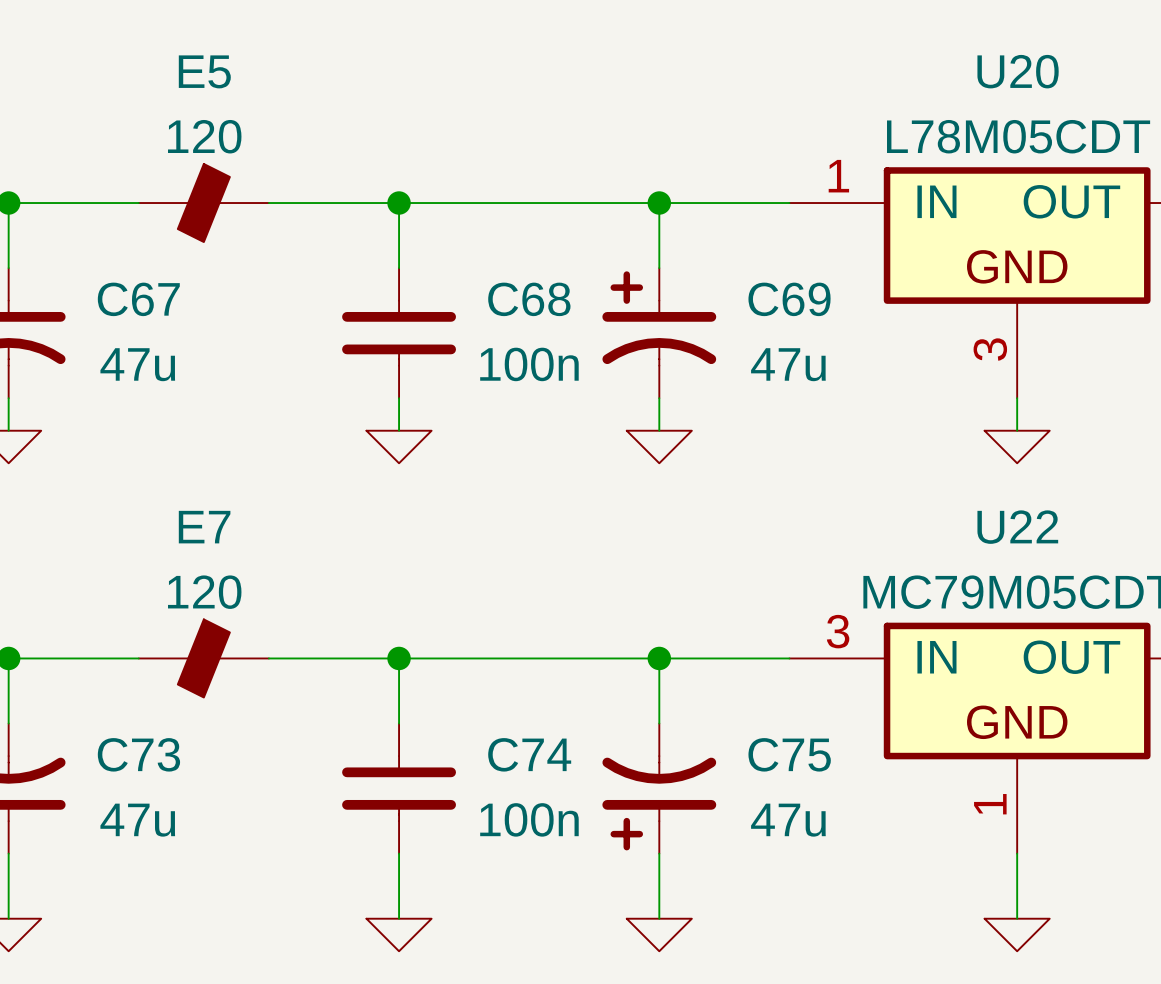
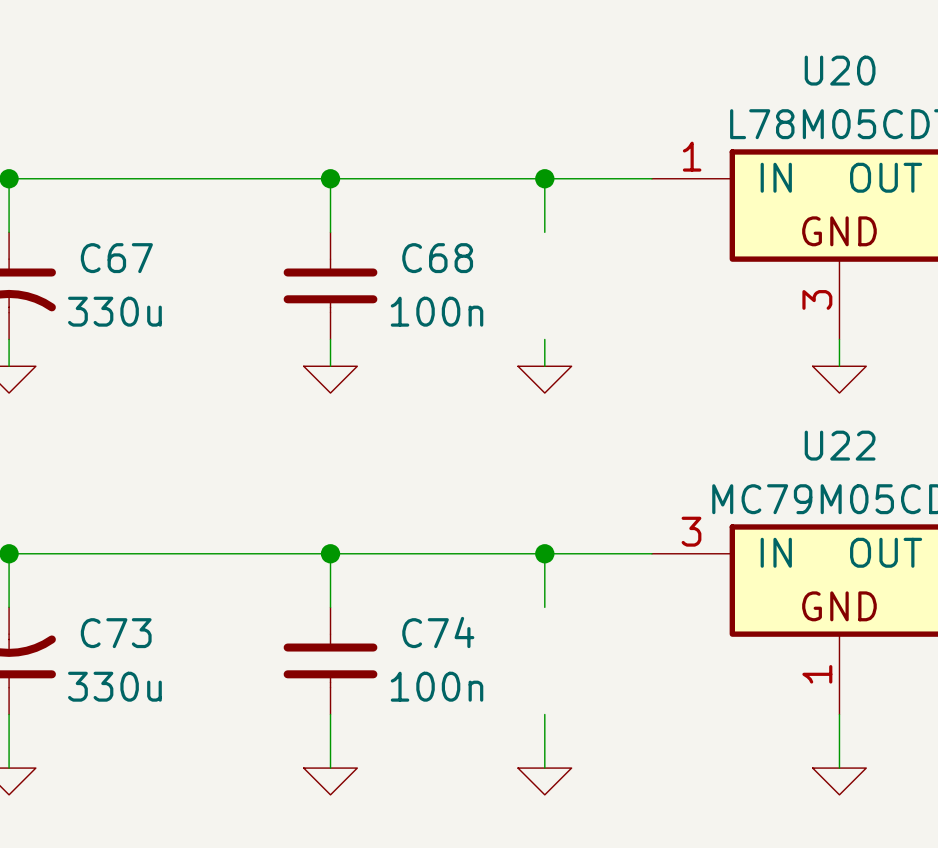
E5: 120 (203, 203) -> none
C69: 47u (659, 333) -> none
C67 value: 47u (137, 364) -> 330u (114, 311)
E7: 120 (203, 658) -> none
C75: 47u (659, 788) -> none
C73 value: 47u (137, 820) -> 330u (114, 686)

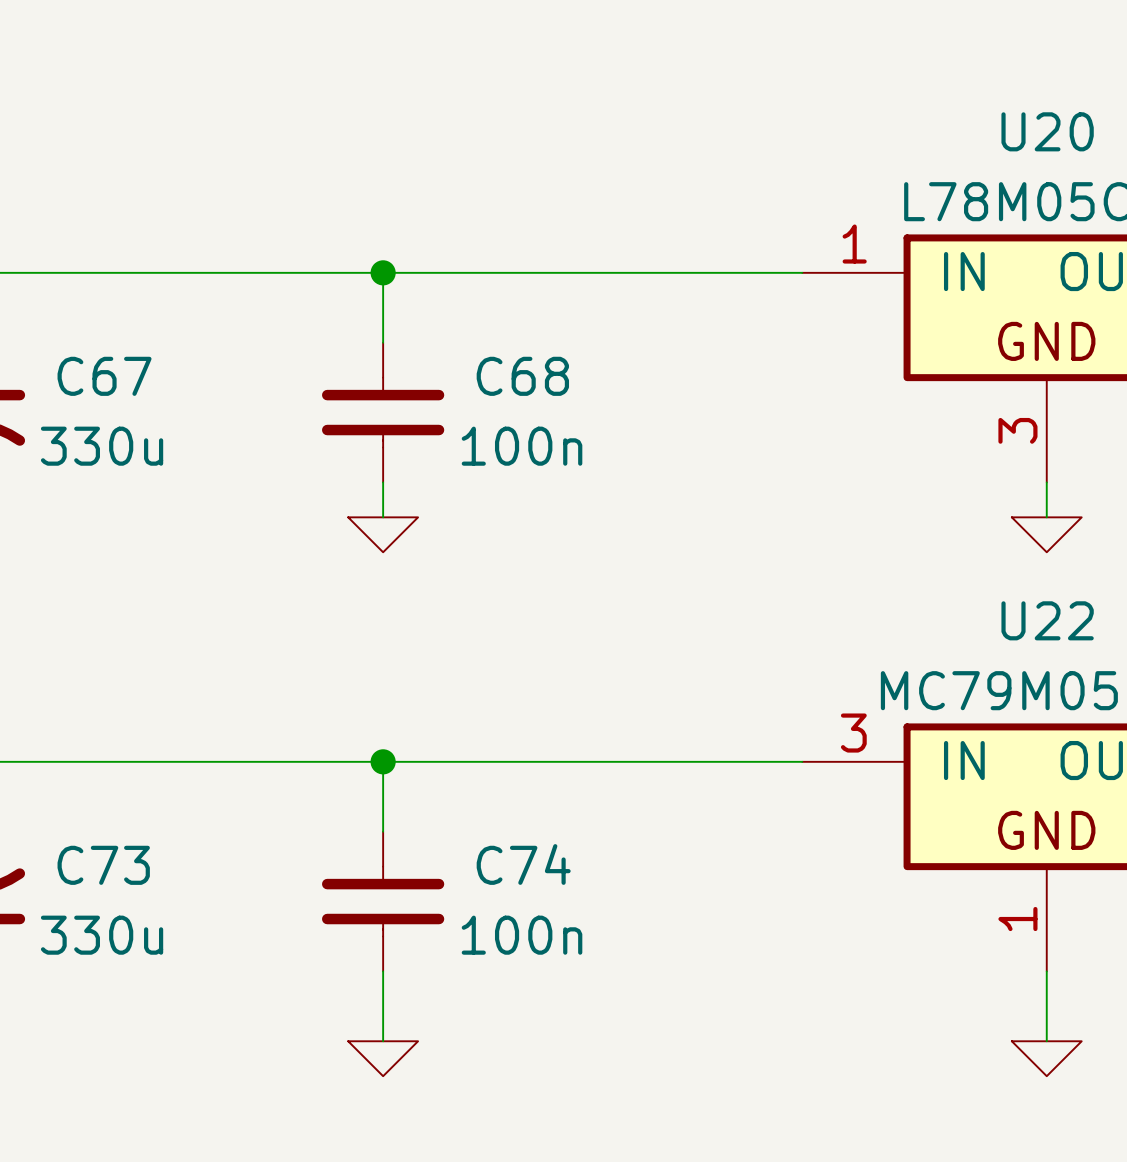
wire: (544, 178) (544, 232) -> none
junction: (544, 178) -> none
wire: (544, 339) (544, 366) -> none
power symbol: (544, 379) -> none
wire: (544, 553) (544, 607) -> none
junction: (544, 553) -> none
wire: (544, 714) (544, 768) -> none
power symbol: (544, 781) -> none

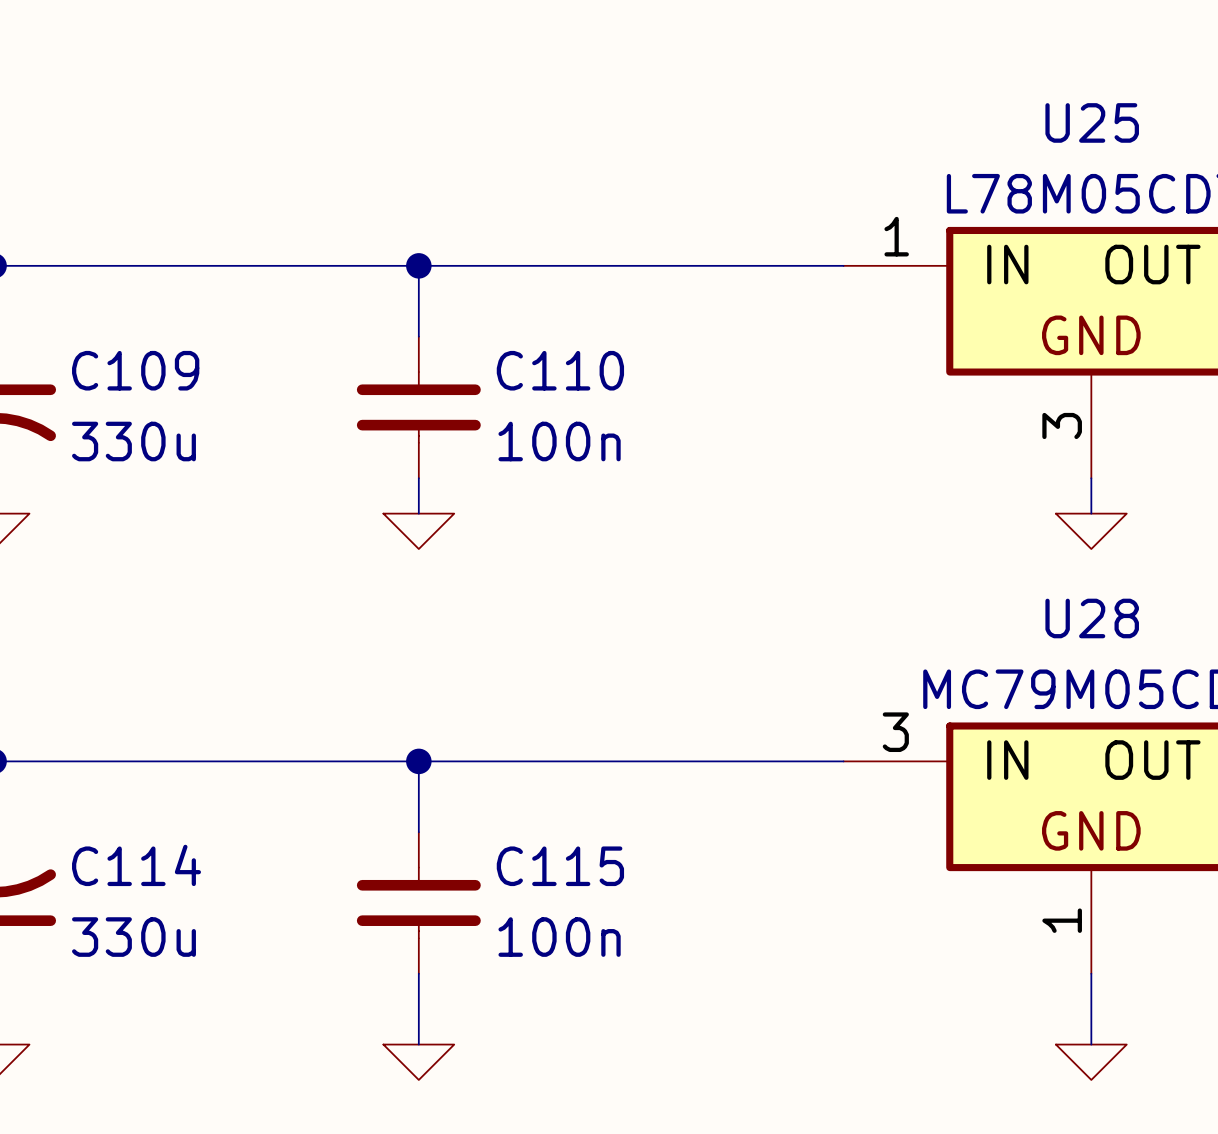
U20 name: U20 (1047, 131) -> U25 (1092, 122)
C67 name: C67 (104, 376) -> C109 (135, 370)
C68 name: C68 (522, 376) -> C110 (560, 370)
U22 name: U22 (1047, 620) -> U28 (1092, 618)
C74 name: C74 (523, 864) -> C115 (560, 866)
C73 name: C73 (103, 865) -> C114 (136, 865)

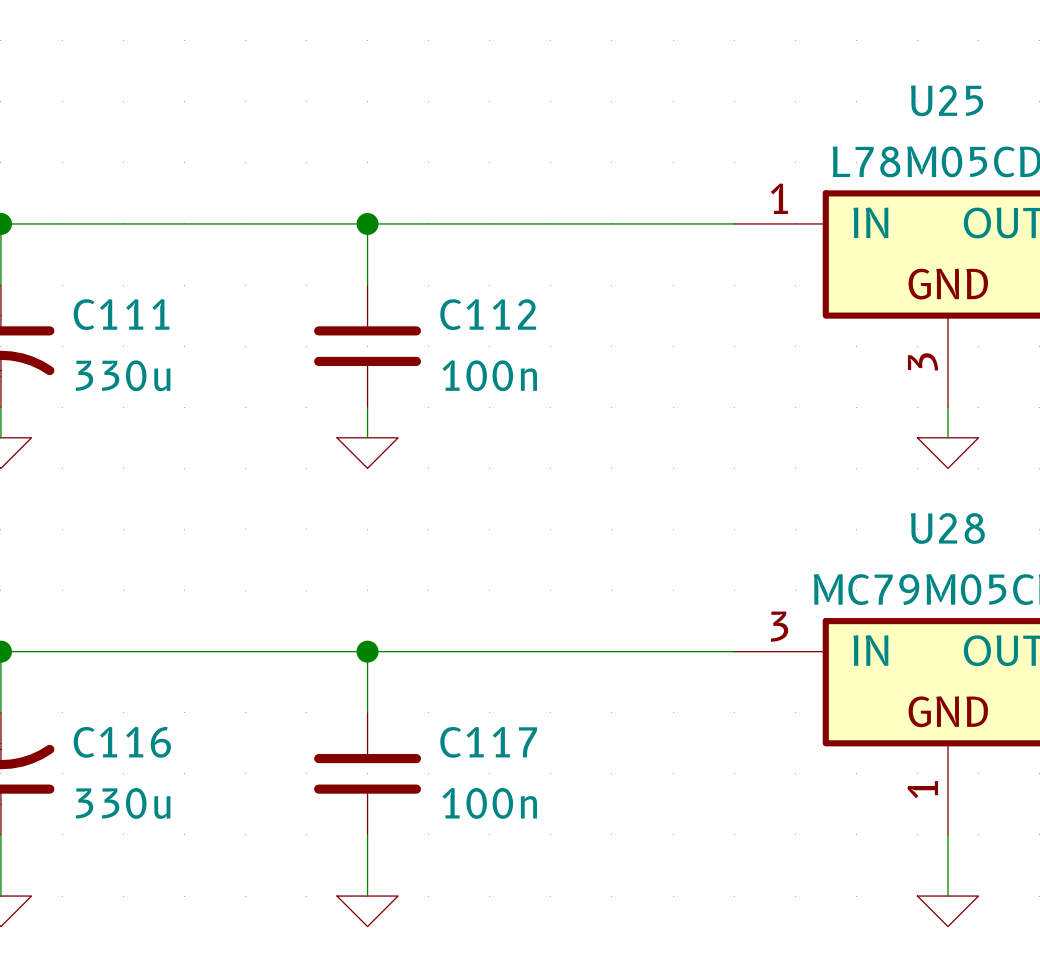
C109 name: C109 (135, 370) -> C111 (121, 314)
C110 name: C110 (560, 370) -> C112 (488, 314)
C114 name: C114 (136, 865) -> C116 (122, 742)
C115 name: C115 (560, 866) -> C117 (488, 742)

